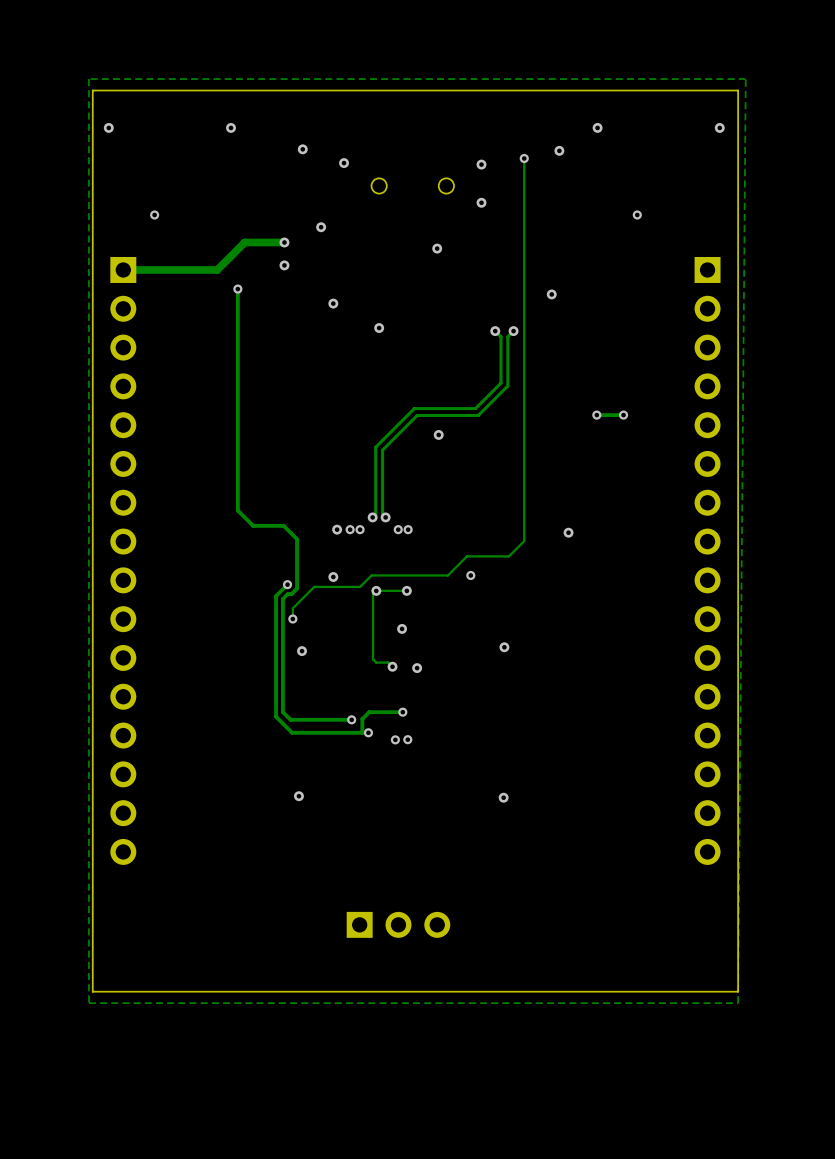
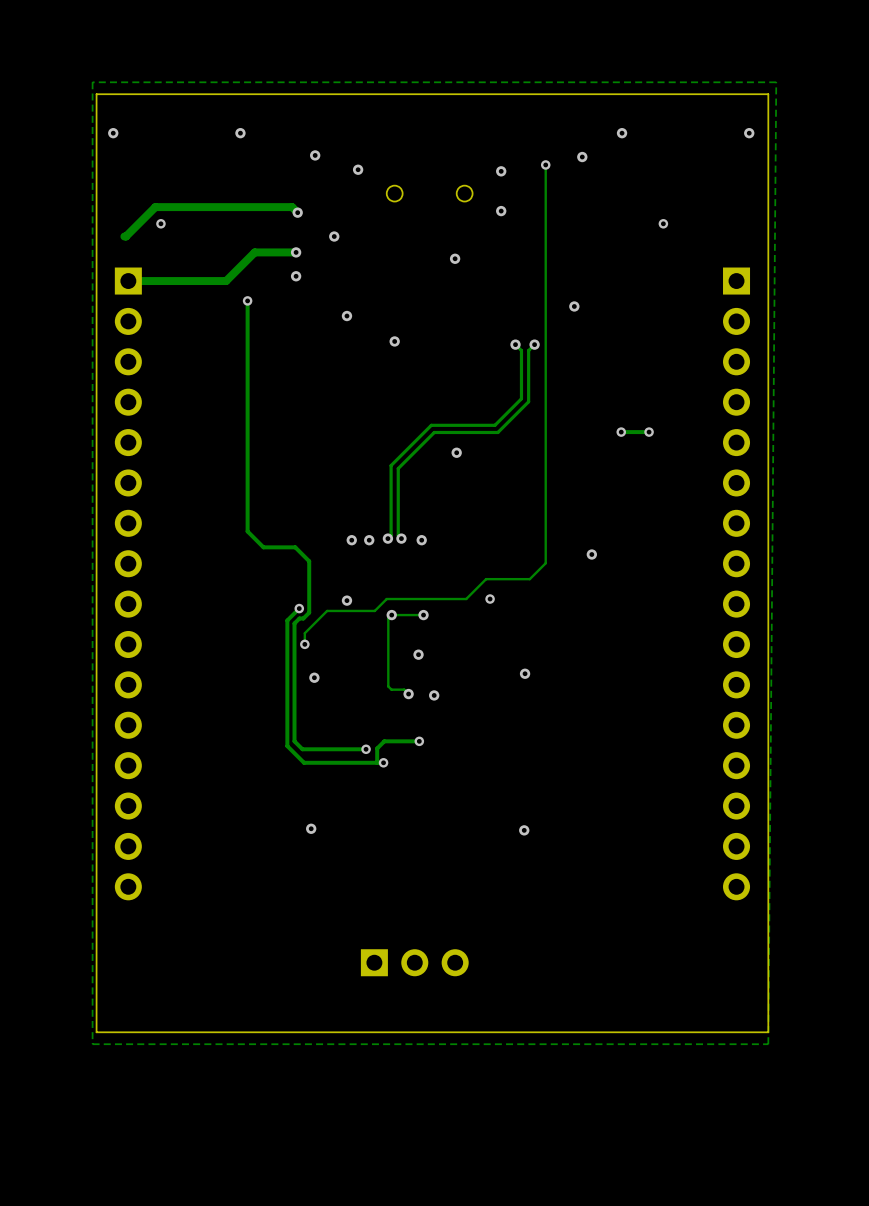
track: none -> (297, 212) (292, 207) (155, 207) (124, 236)
via: none -> (297, 212)
via: none -> (351, 540)
via: none -> (369, 540)
via: none -> (421, 540)
via: (337, 529) -> none
via: (350, 529) -> none
via: (360, 529) -> none
via: (398, 529) -> none
via: (408, 529) -> none
via: (395, 739) -> none
via: (407, 739) -> none

